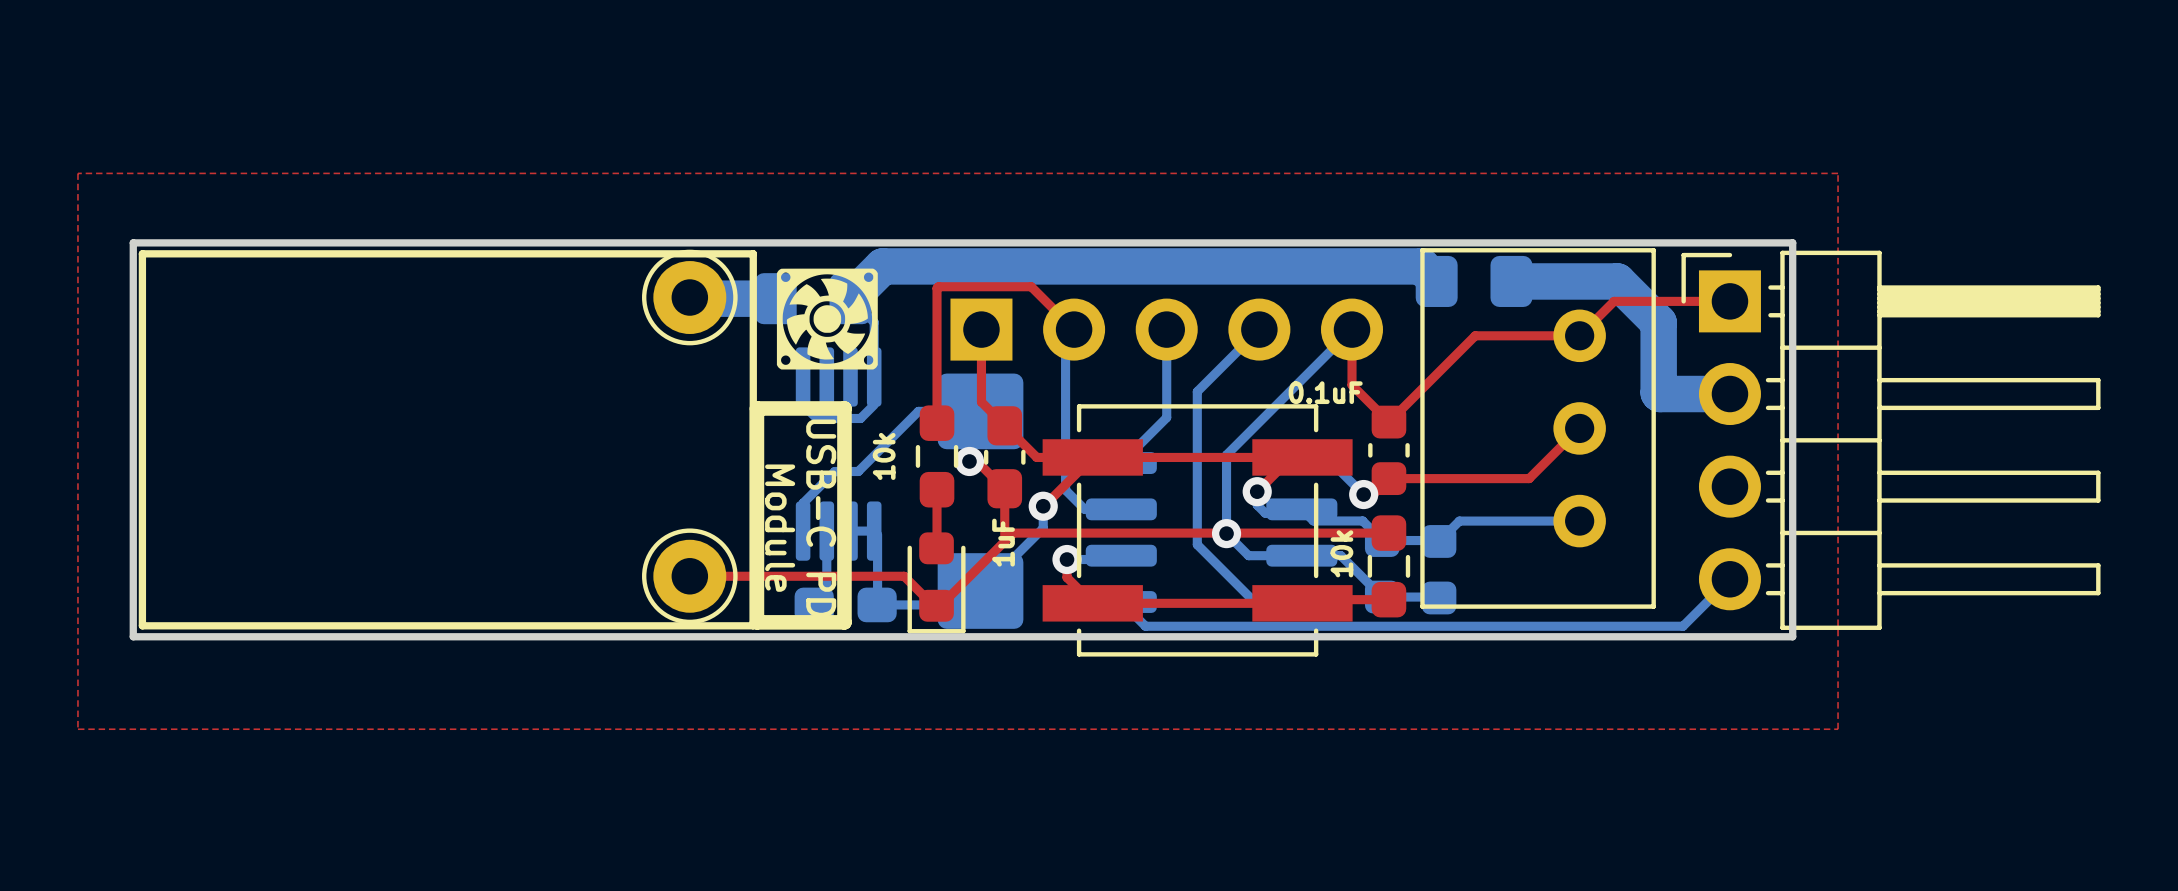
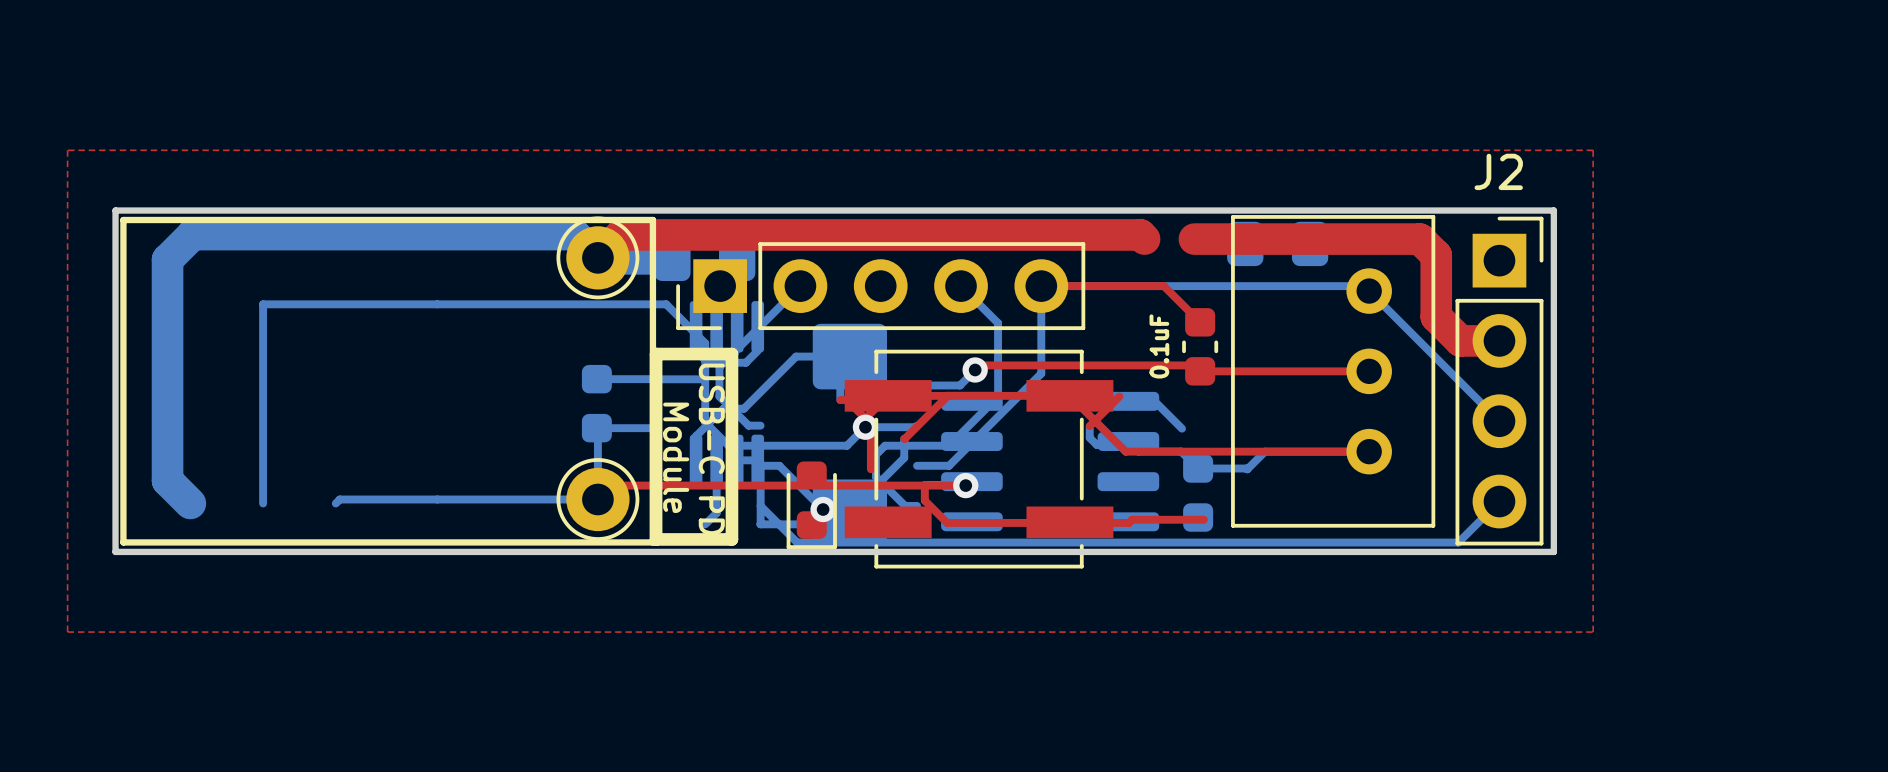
drawing: [776, 268, 878, 370] -> none
top track: none -> (1144, 239) (1140, 234) (620, 234) (597, 257)
top track: none -> (1194, 239) (1419, 239) (1436, 255) (1436, 316) (1460, 340) (1499, 340)
bottom track: (1436, 281) (1421, 266) (882, 266) (850, 298) (874, 322) (874, 376) -> none
bottom track: (1511, 281) (1617, 281) (1658, 322) (1658, 392) (1729, 394) -> none
bottom track: none -> (597, 257) (574, 234) (192, 234) (167, 259) (167, 480) (190, 503)
top track: (1729, 301) (1614, 301) (1579, 335) (1475, 335) (1388, 422) (1352, 385) (1352, 329) -> none
top track: (981, 329) (981, 402) (1036, 457) (1302, 457) -> none
top track: (1074, 329) (1031, 286) (938, 286) (937, 288) (937, 423) -> none
bottom track: (1074, 329) (1065, 338) (1065, 490) (1084, 509) (1121, 509) -> none
bottom track: (1166, 329) (1166, 417) (1121, 463) -> none
part: (1166, 329) -> none
bottom track: (1259, 329) (1197, 391) (1197, 544) (1254, 602) (1301, 602) -> none
bottom track: (1352, 329) (1226, 455) (1226, 533) (1248, 555) (1340, 555) (1382, 597) (1439, 597) -> none
bottom track: none -> (800, 286) (719, 367) (719, 396) (748, 425) (760, 425)
part: none -> (880, 286)
bottom track: none -> (961, 286) (998, 323) (998, 396) (949, 445) (885, 445) (875, 454) (875, 476) (905, 505) (917, 505)
top track: none -> (1041, 286) (1163, 286) (1200, 322)
part value rotation: 0° (1325, 392) -> 90° counterclockwise (1159, 346)
via: none -> (975, 369)
bottom track: none -> (975, 370) (959, 385) (917, 385)
top track: (1579, 428) (1529, 478) (1388, 478) (1373, 494) (1363, 494) -> (1368, 371) (1200, 371) (1194, 365) (979, 365) (975, 369)
bottom track: none -> (596, 379) (654, 379)
bottom track: none -> (655, 379) (705, 379)
J2: none -> (1499, 381)
part: (1890, 440) -> none
part position: (1388, 450) -> (1200, 346)
part: 10k (937, 456) -> none
part: 1uF (1004, 457) -> none
via: (969, 461) -> none
bottom track: none -> (1499, 421) (1364, 286) (1041, 286) (1041, 373) (949, 465) (917, 465)
top track: (937, 489) (937, 545) -> none
bottom track: none -> (917, 425) (915, 427) (865, 427) (846, 445) (728, 445) (705, 422) (705, 343) (666, 304) (263, 304) (263, 503)
via: (1257, 491) -> none
top track: none -> (865, 427) (865, 418) (888, 395) (1069, 395) (1125, 451) (1369, 451)
via: none -> (865, 427)
bottom track: none -> (596, 428) (654, 428)
via: (1363, 494) -> none
bottom track: none -> (597, 429) (597, 499) (339, 499) (335, 503)
via: (1043, 506) -> none
part position: (1197, 530) -> (979, 459)
via: (1226, 533) -> none
top track: (1388, 533) (1013, 533) (937, 609) (904, 576) (689, 576) -> none
bottom track: none -> (760, 465) (779, 465) (823, 509)
via: (1067, 559) -> none
top track: none -> (611, 485) (965, 485)
via: none -> (965, 485)
part: 10k (1388, 566) -> none
part position: (1439, 569) -> (596, 403)
bottom track: (1729, 579) (1683, 626) (1145, 626) (1121, 602) -> (1499, 501) (1458, 542) (797, 542) (760, 505)
via: none -> (823, 509)
part: (845, 604) -> none

